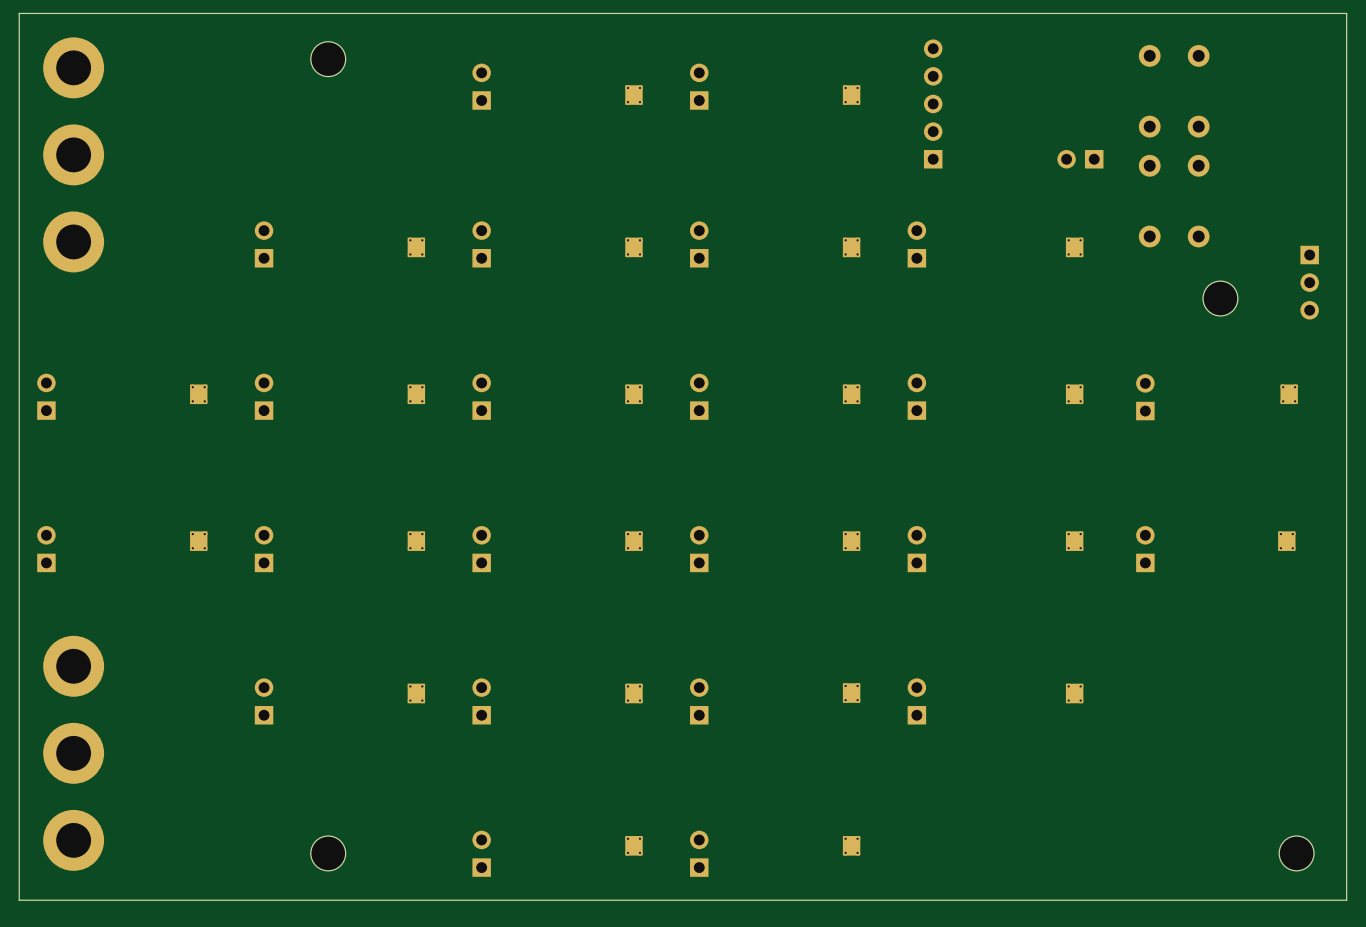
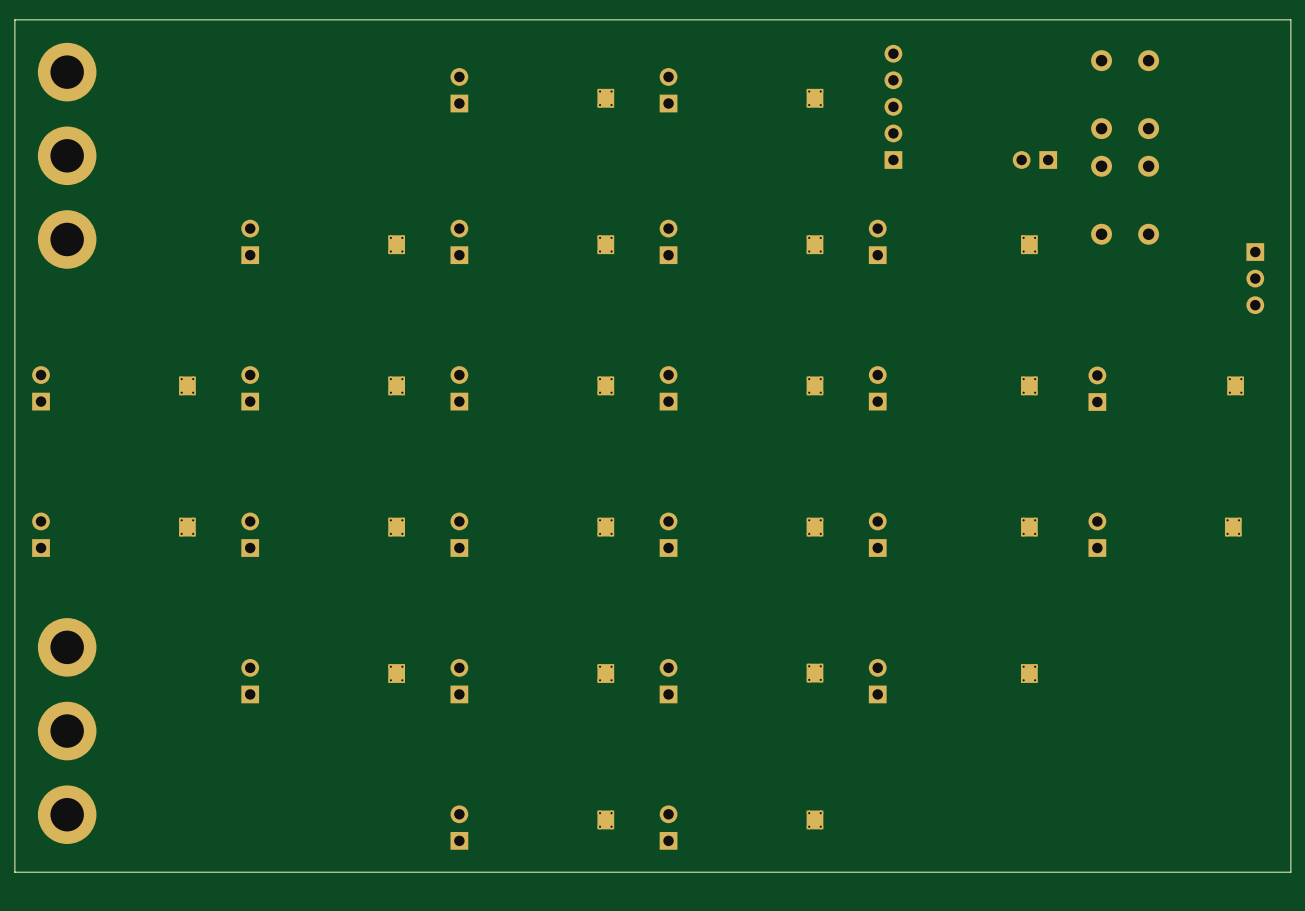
part: (328, 59) -> none
part: (1220, 298) -> none
part: (328, 853) -> none
part: (1296, 853) -> none

